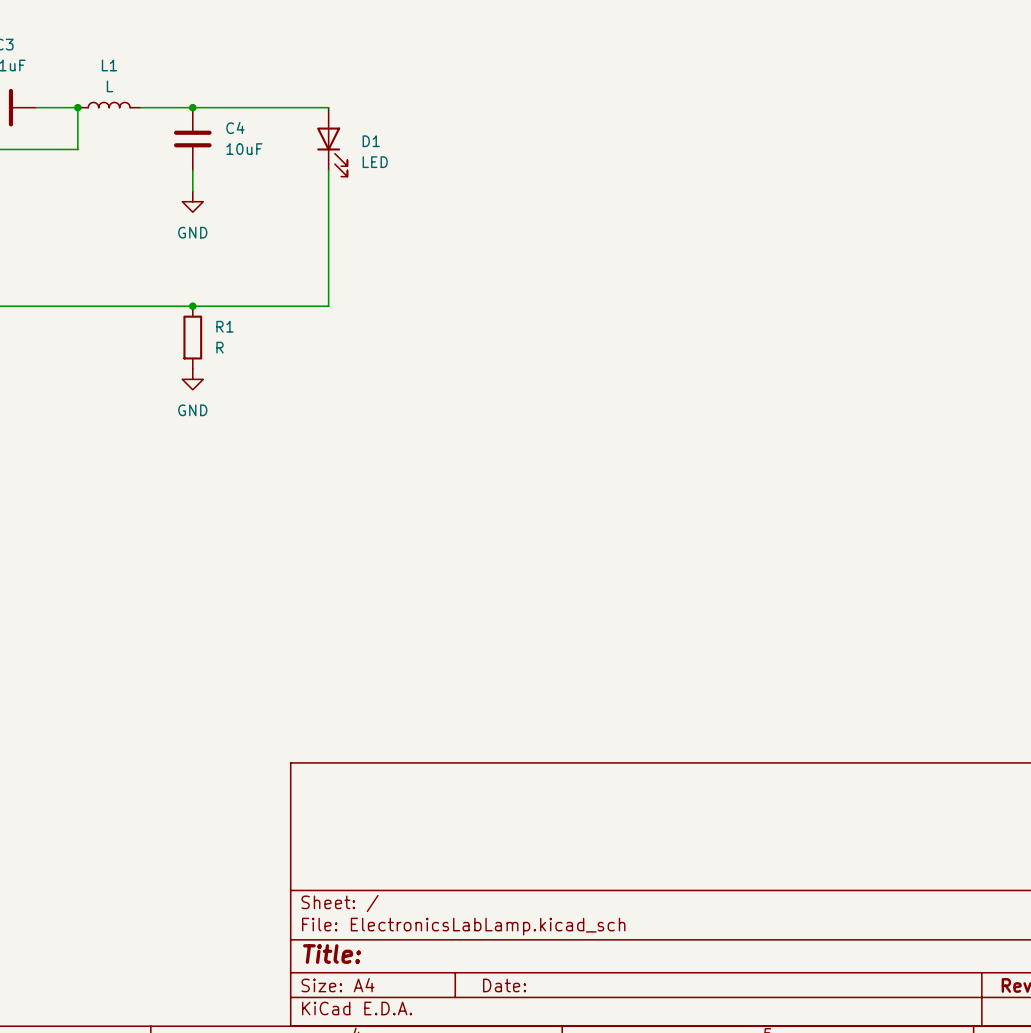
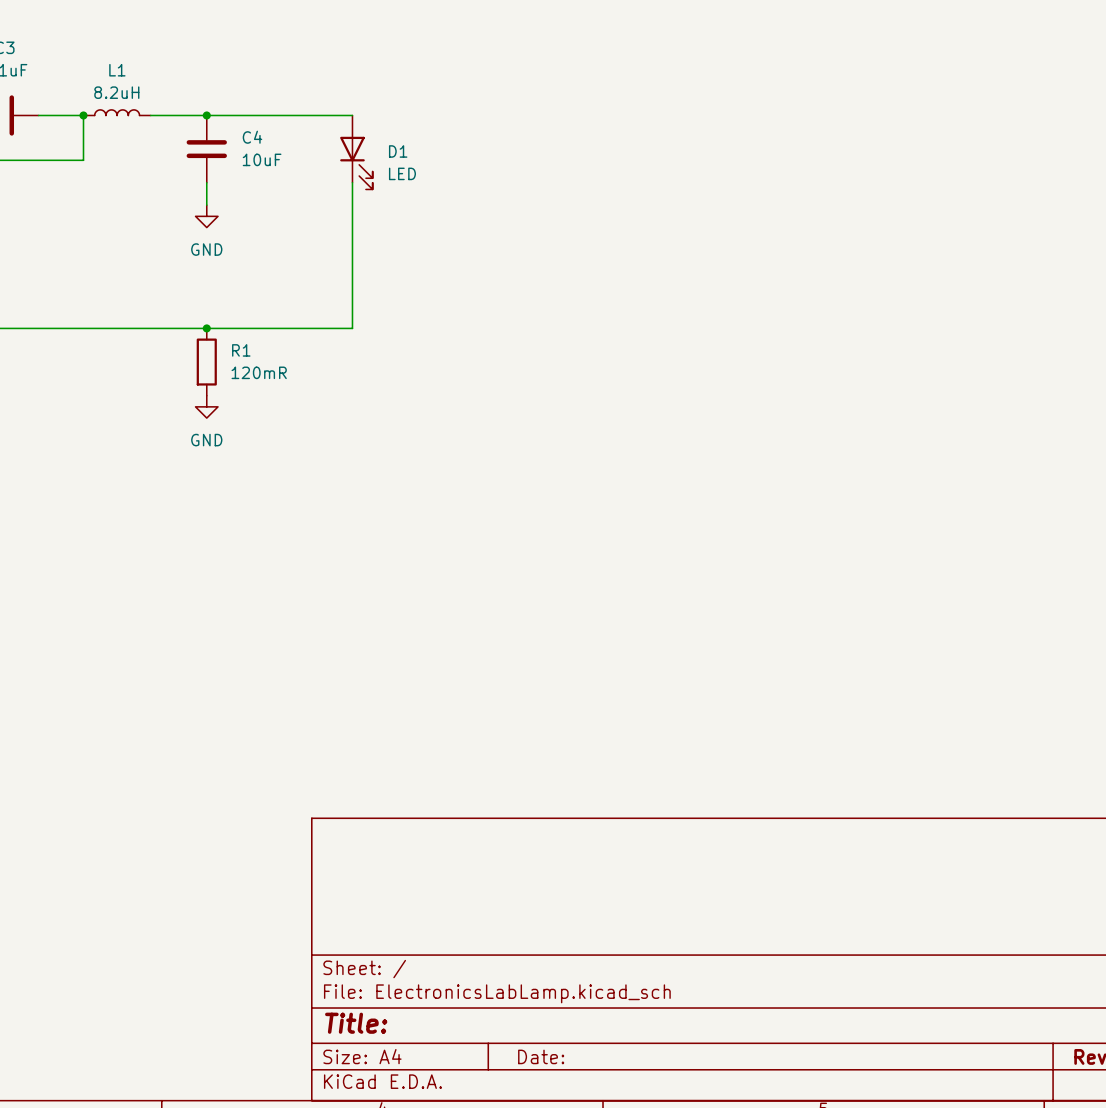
L1 value: L (109, 86) -> 8.2uH (116, 92)
R1 value: R (219, 347) -> 120mR (259, 372)

